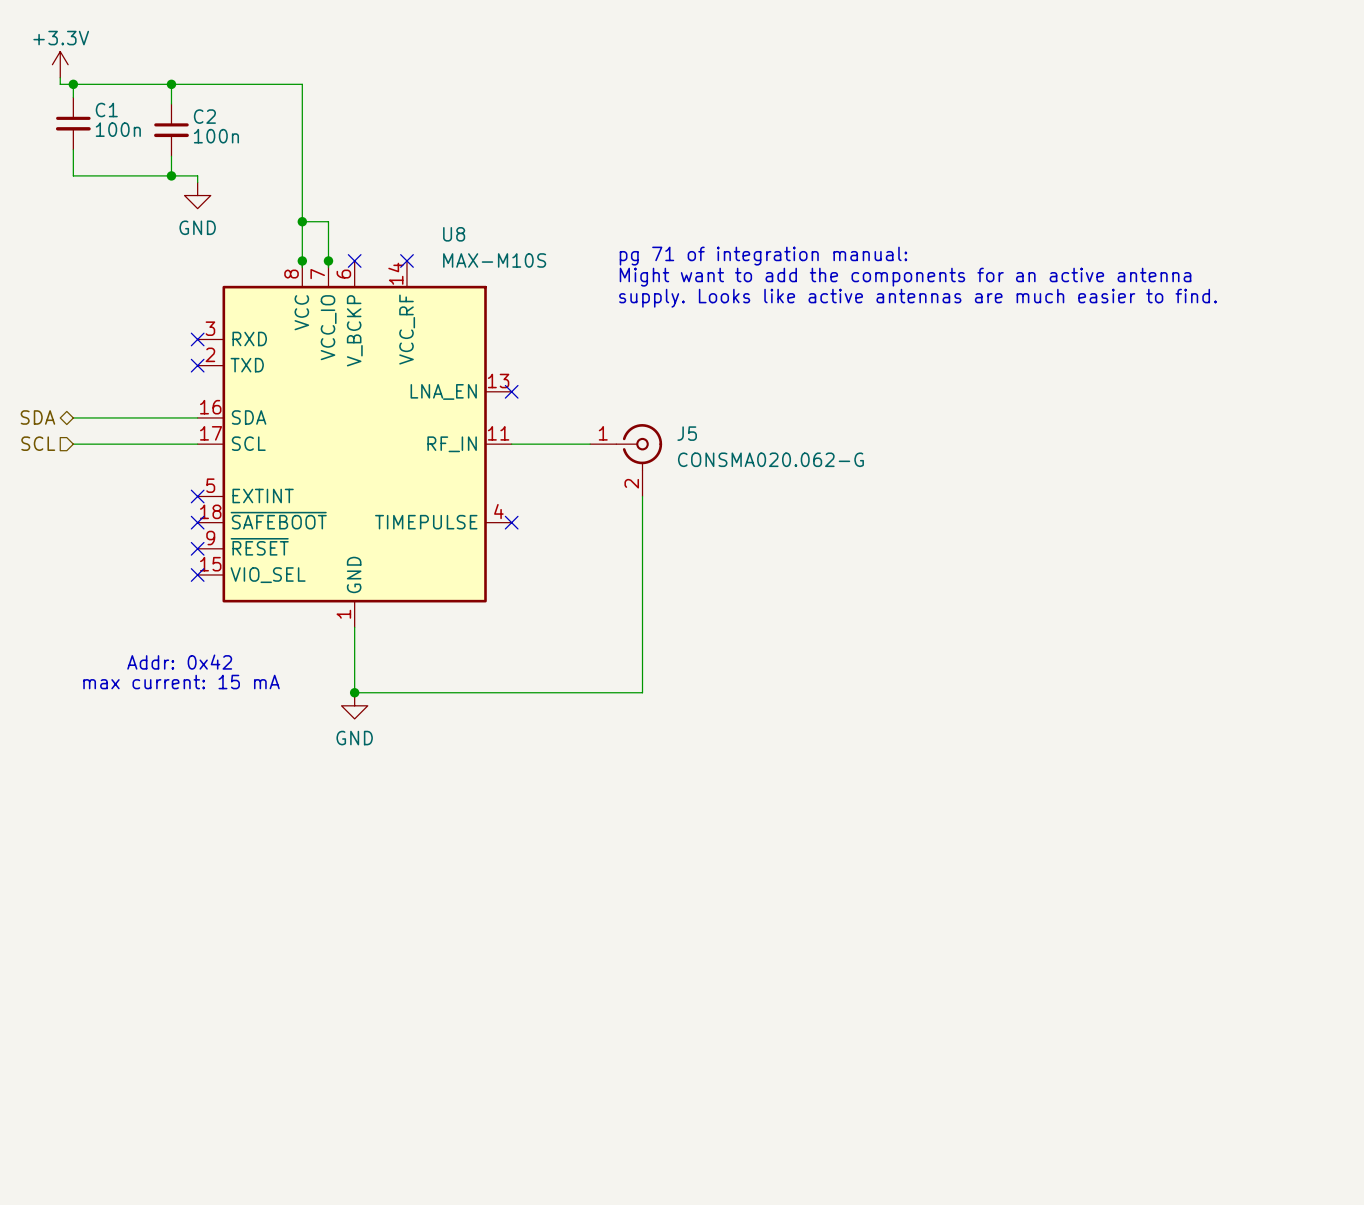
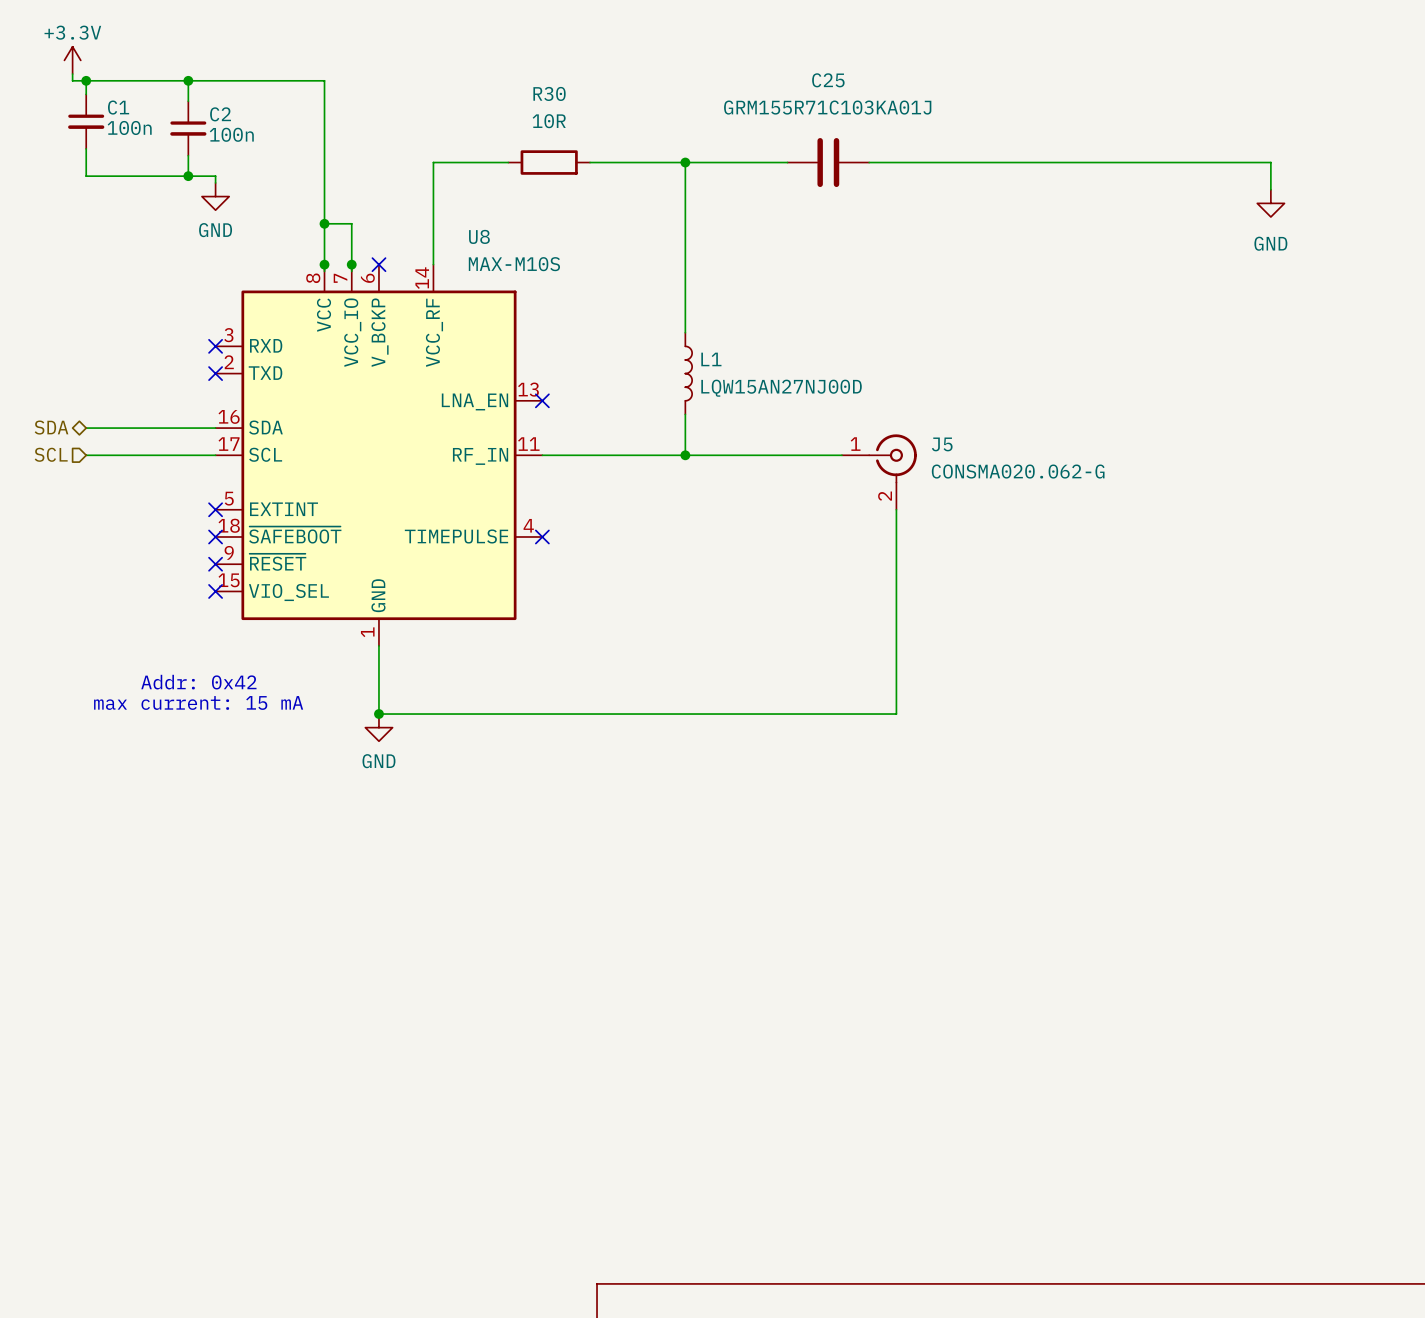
wire: none -> (508, 162) (433, 162) (433, 264)
R30: none -> 10R (549, 162)
wire: none -> (590, 162) (787, 162)
wire: none -> (685, 162) (685, 332)
junction: none -> (685, 162)
C25: none -> GRM155R71C103KA01J (828, 162)
wire: none -> (869, 162) (1270, 162) (1270, 189)
power symbol: none -> GND (1270, 203)
text: pg 71 of integration manual: (763, 256) -> none
no-connect mark: (406, 260) -> none
text: Might want to add the components for an active antenna (905, 277) -> none
text: supply. Looks like active antennas are much easier to find. (917, 298) -> none
L1: none -> LQW15AN27NJ00D (688, 373)
wire: none -> (685, 414) (685, 455)
wire: none -> (624, 455) (841, 455)
junction: none -> (685, 455)
J5 position: (626, 460) -> (879, 472)
wire: (642, 496) (642, 692) -> (896, 509) (896, 714) (678, 714)

